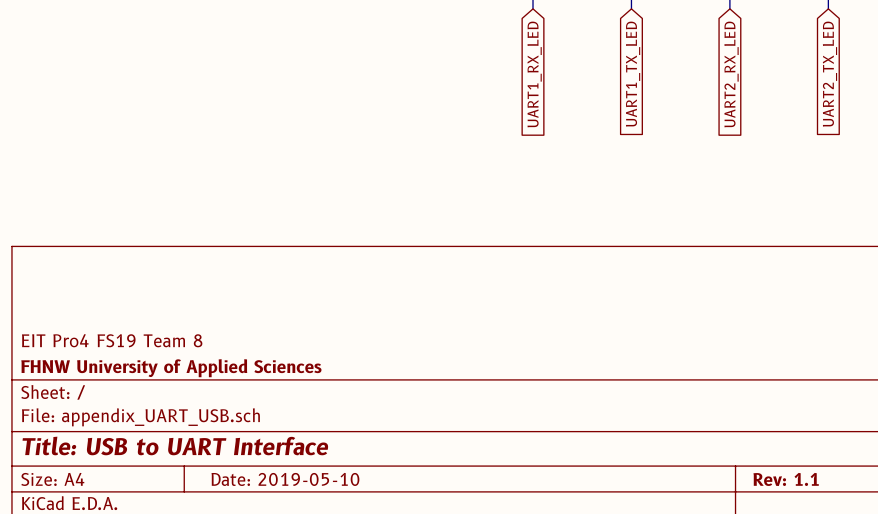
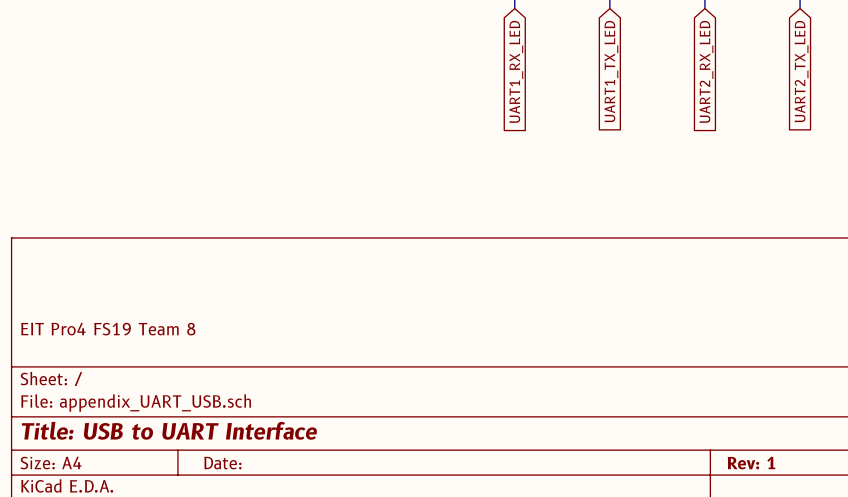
title block: FHNW University of Applied Sciences (171, 368) -> none
title block: Date: 2019-05-10 (285, 479) -> Date: (222, 463)
title block: Rev: 1.1 (786, 479) -> Rev: 1 (751, 463)

